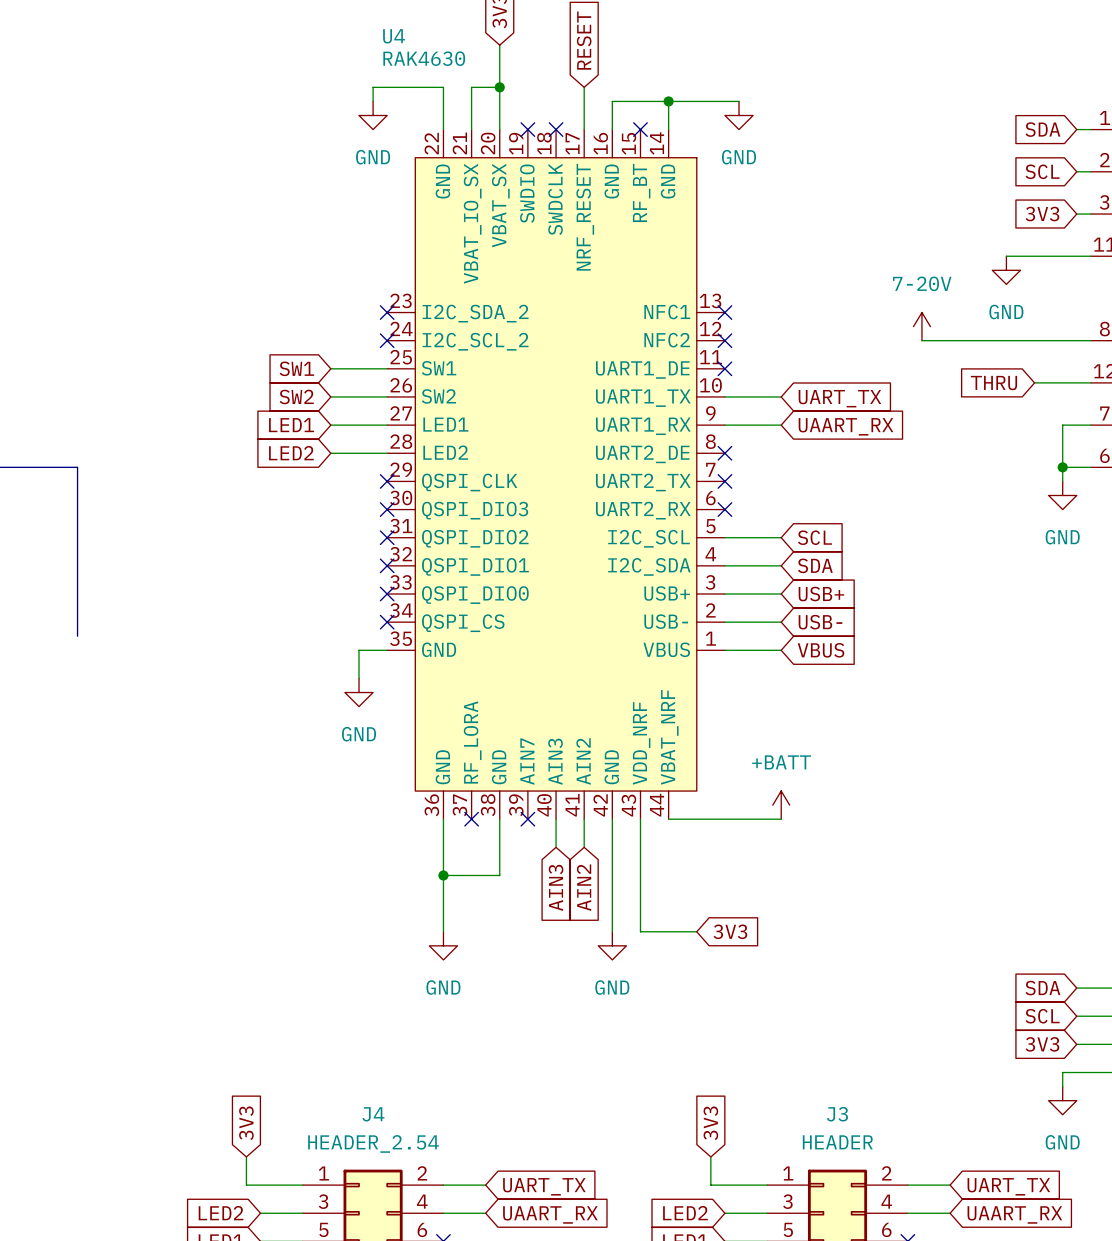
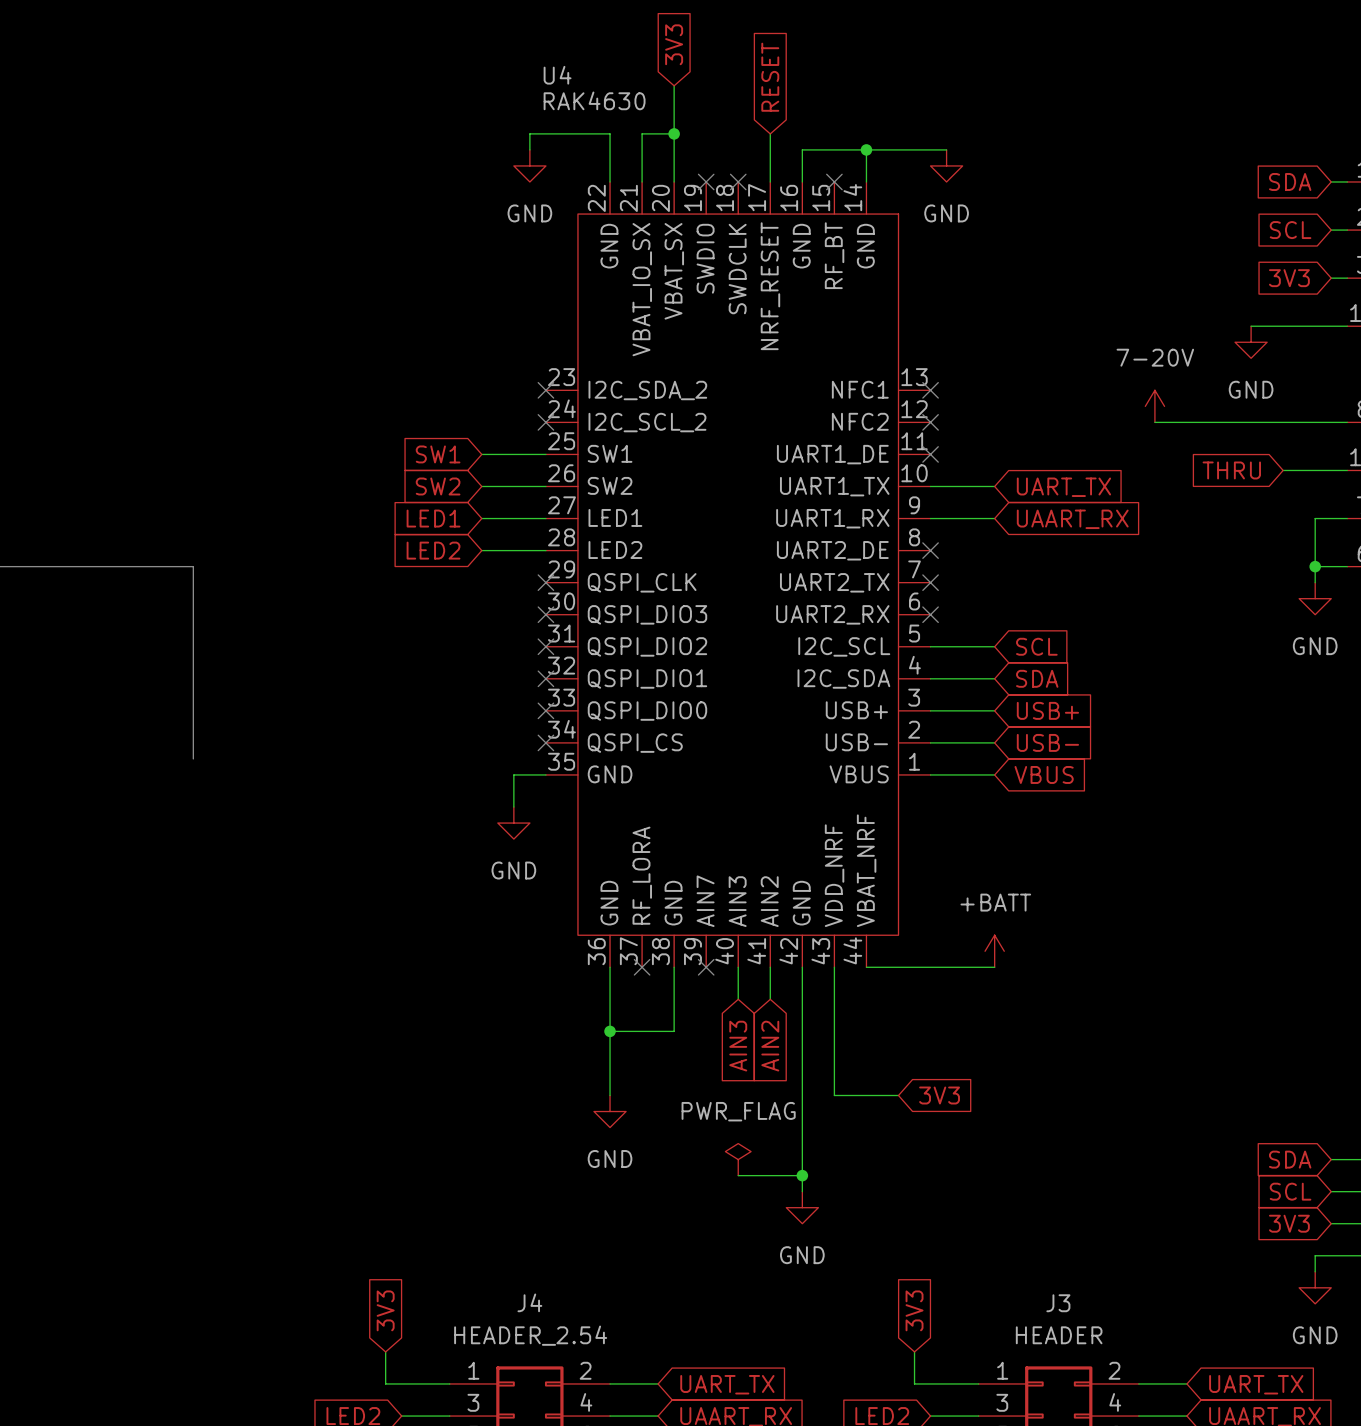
wire: none -> (802, 1095) (802, 1191)
power symbol position: GND (612, 945) -> GND (802, 1207)
power symbol: none -> PWR_FLAG (738, 1159)
wire: none -> (738, 1175) (802, 1175)
junction: none -> (802, 1175)

